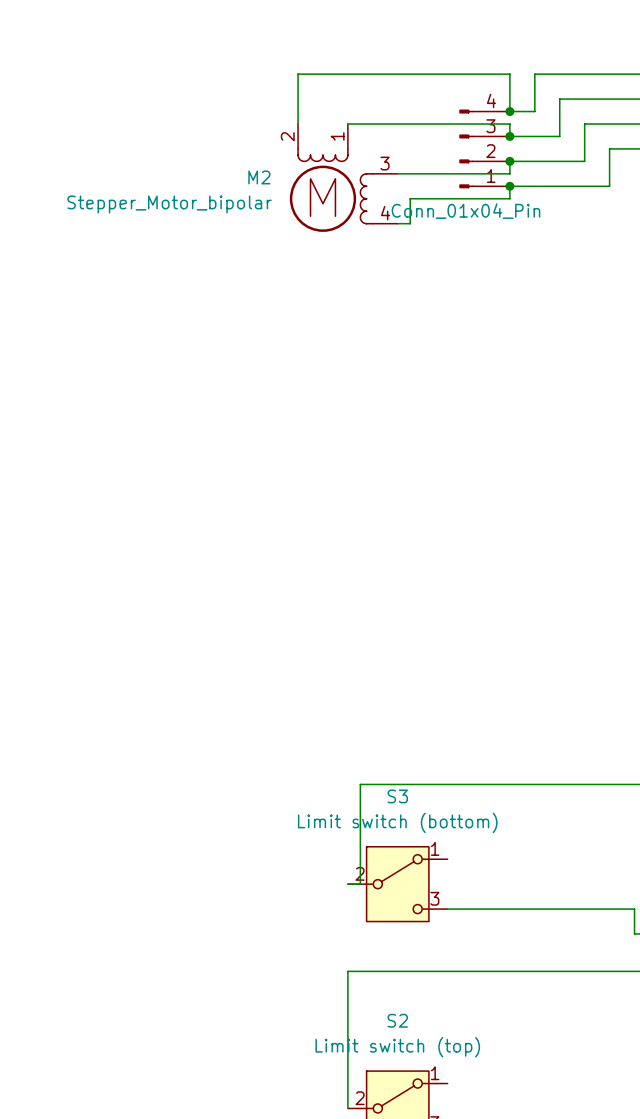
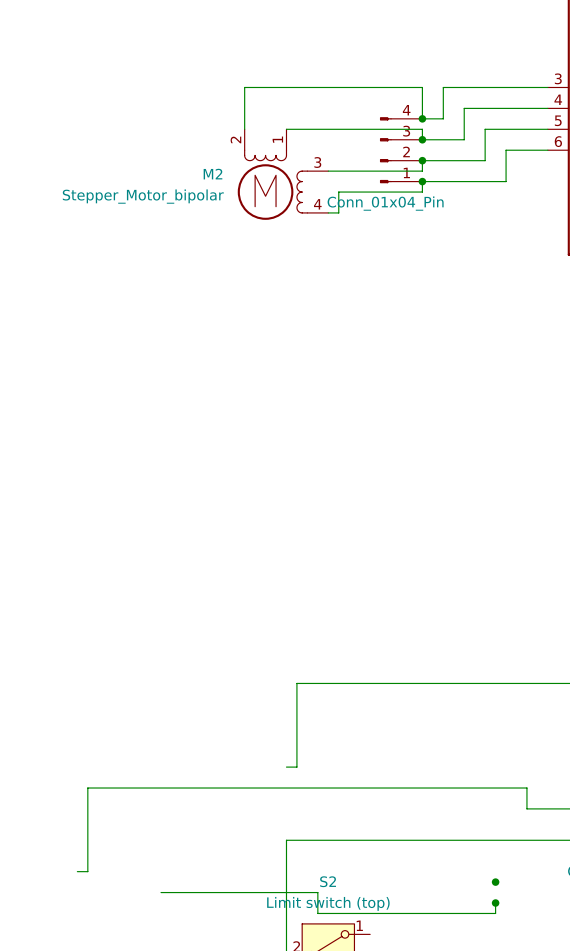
S3: Limit switch (bottom) (397, 884) -> none
wire: none -> (370, 788) (87, 788) (87, 871) (77, 871)
junction: none -> (495, 882)
wire: none -> (161, 892) (317, 892) (317, 913) (495, 913) (495, 903)
junction: none -> (495, 903)

